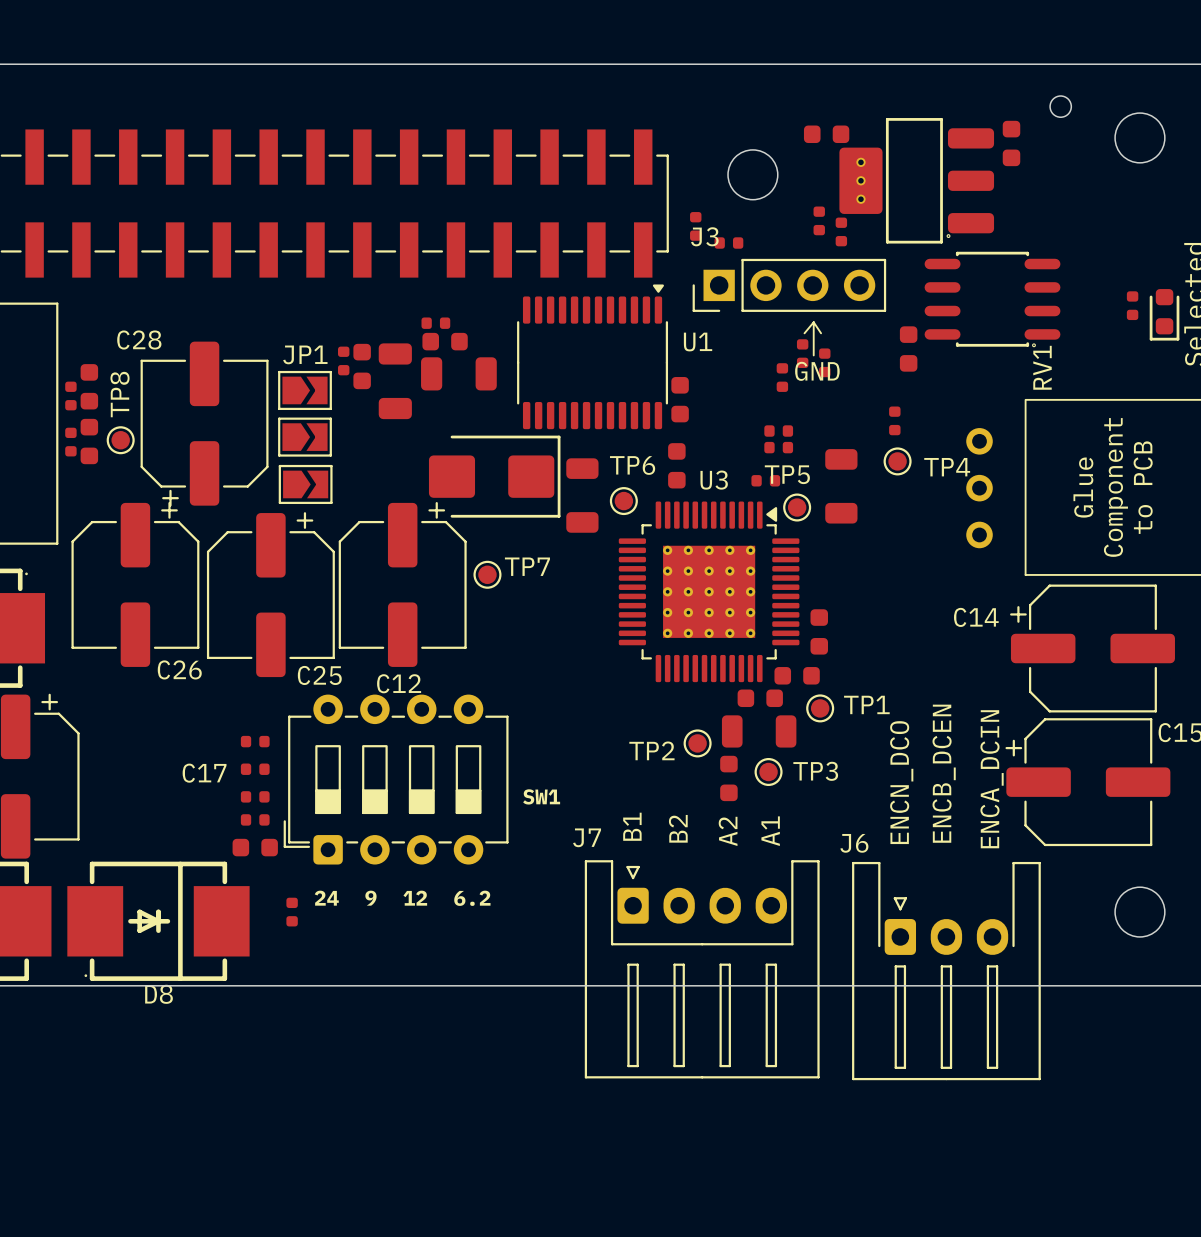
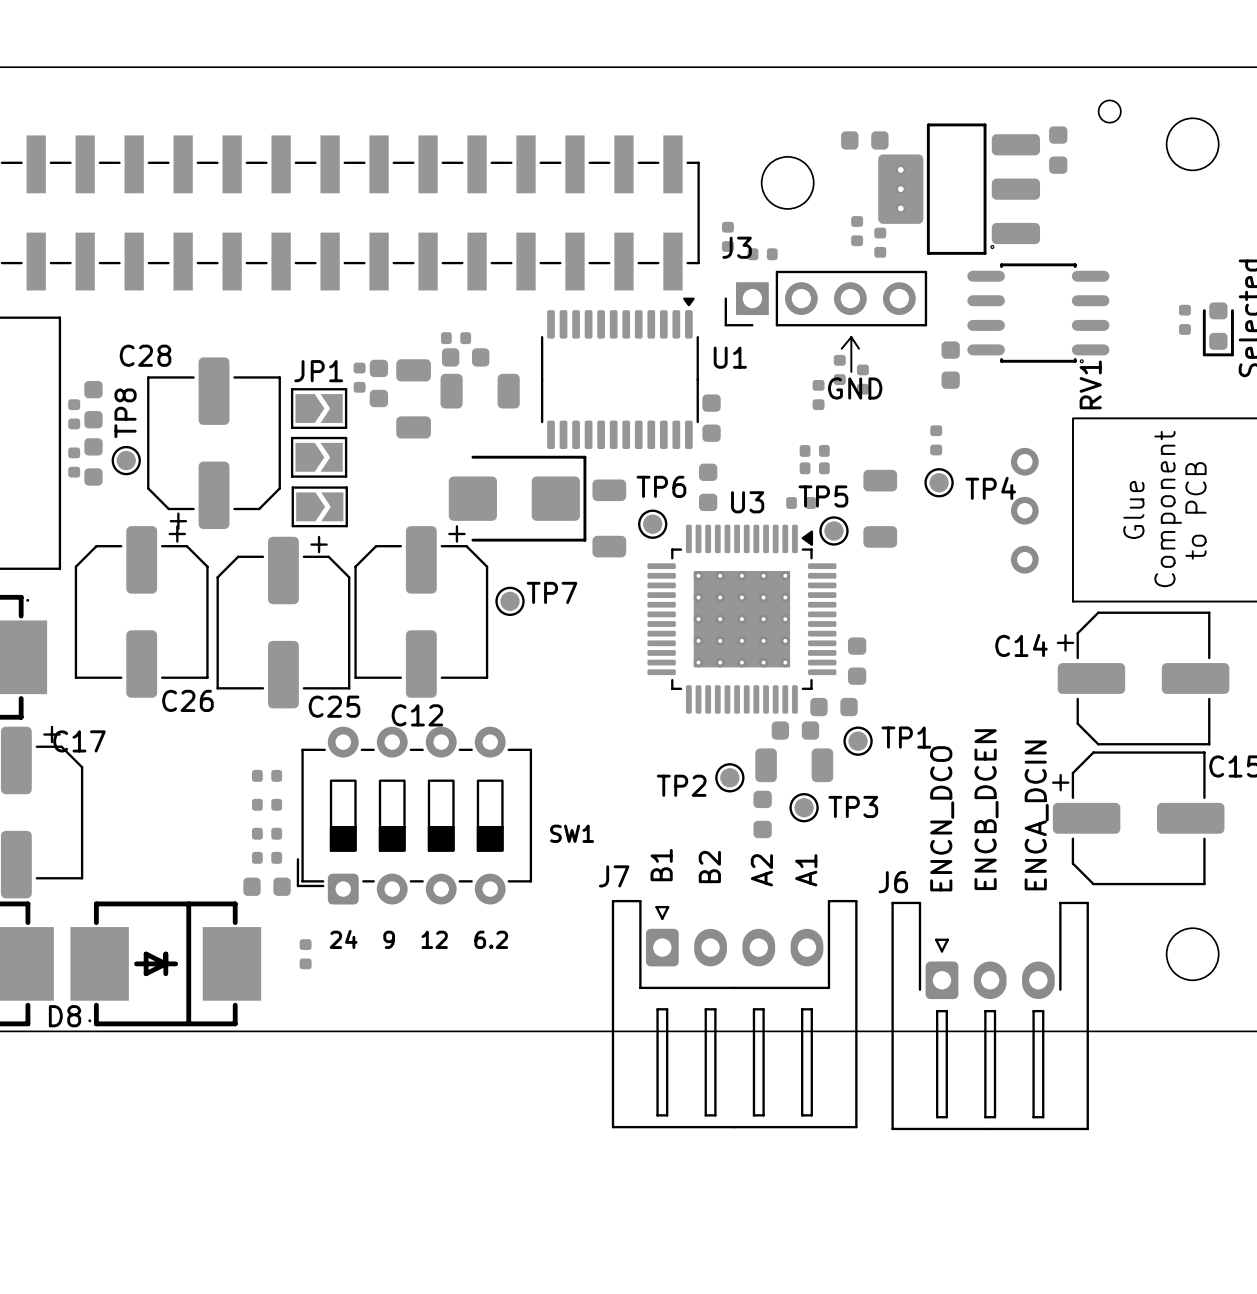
C17 name position: C17 (204, 773) -> C17 (79, 741)
D8 name position: D8 (159, 994) -> D8 (65, 1016)

